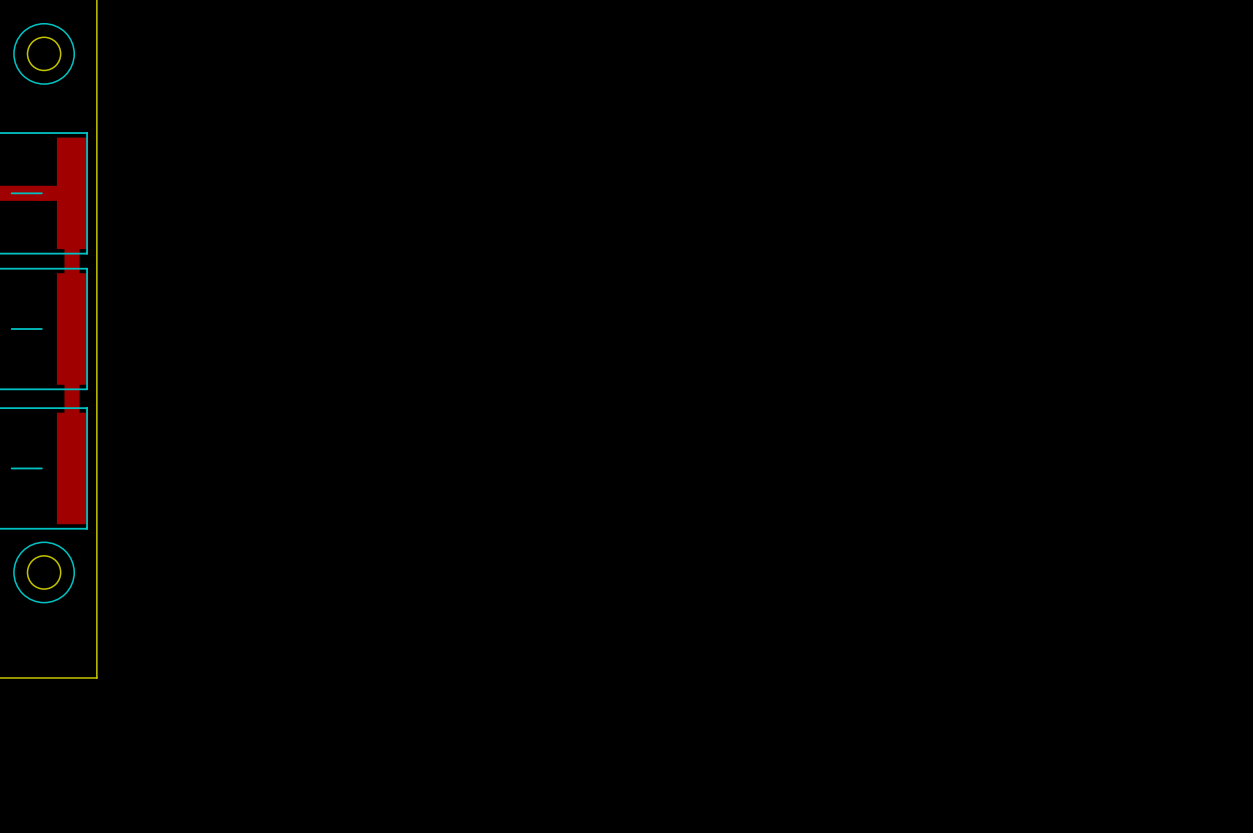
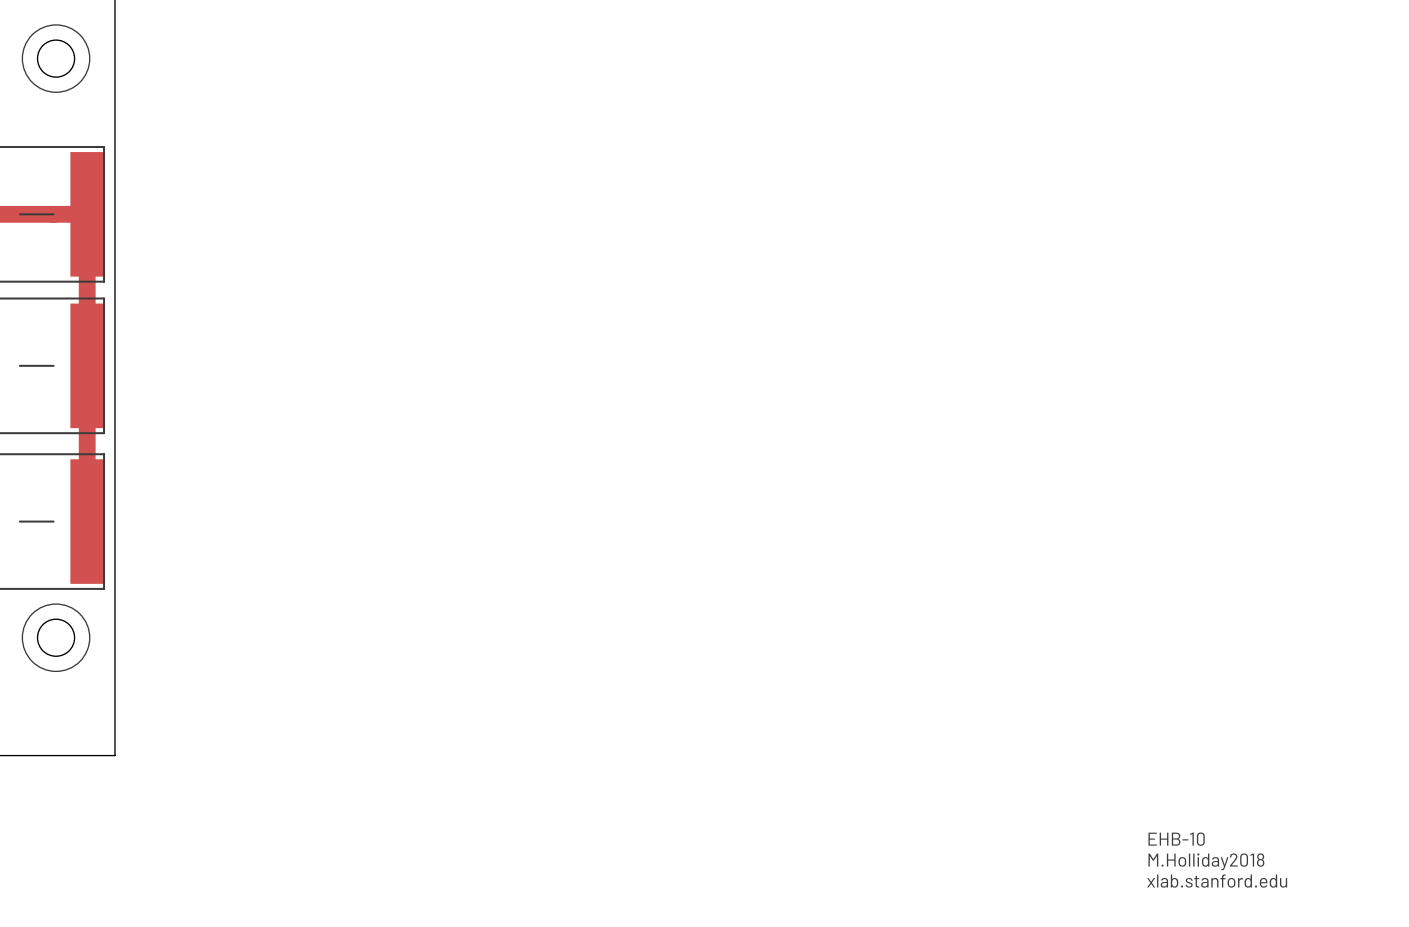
text: none -> EHB-10 (1176, 839)
text: none -> M.Holliday2018 (1206, 861)
text: none -> xlab.stanford.edu (1217, 881)

